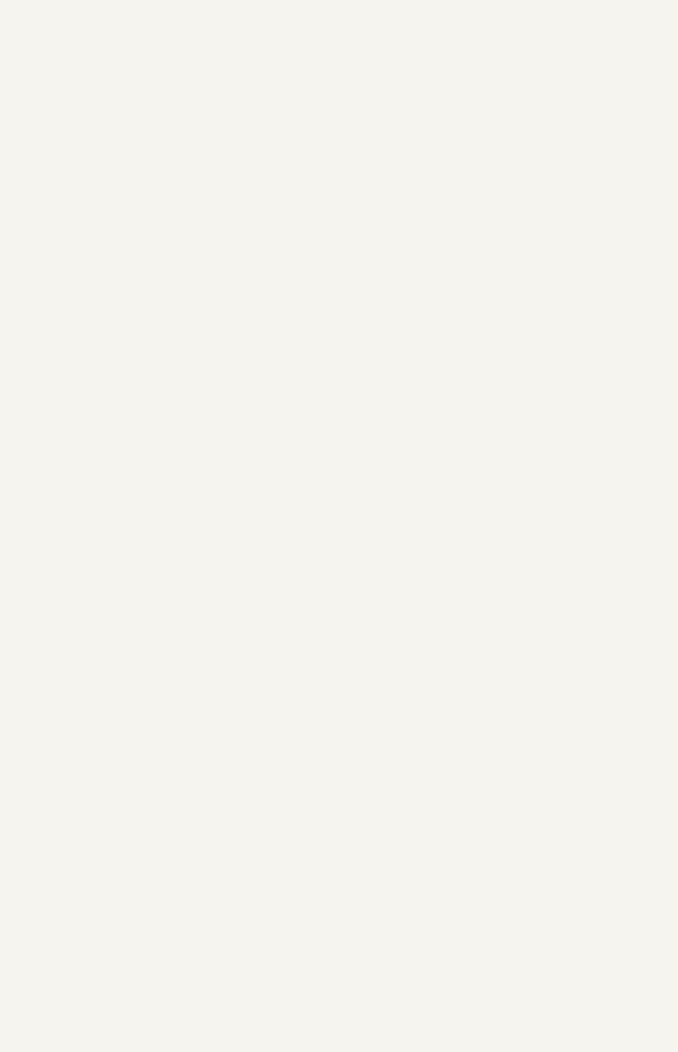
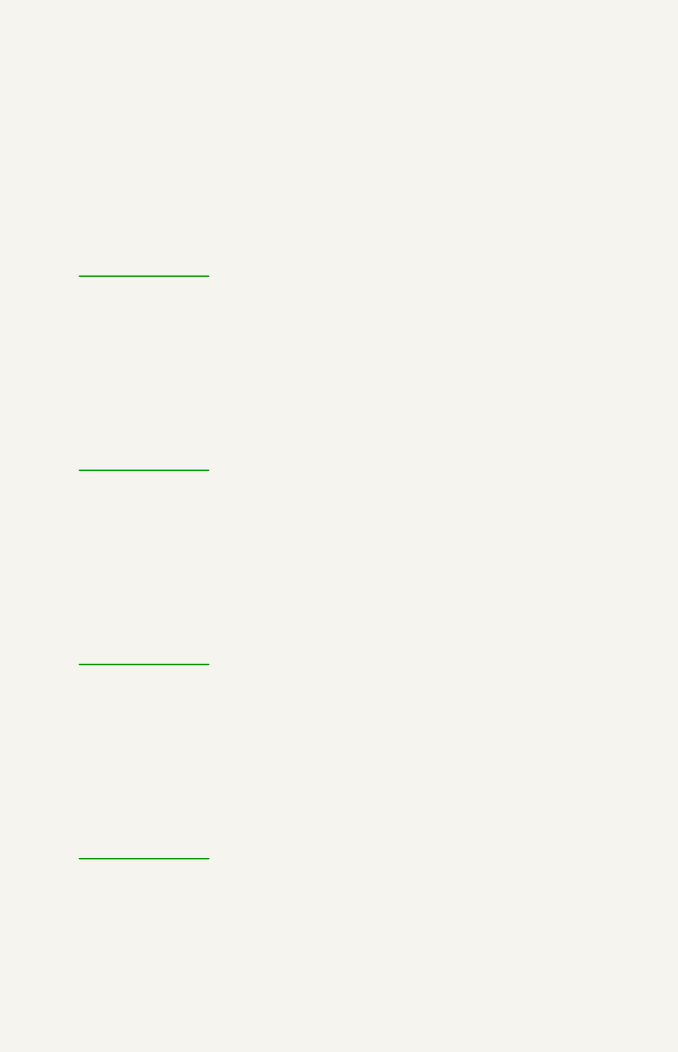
wire: none -> (79, 276) (208, 276)
wire: none -> (79, 470) (208, 470)
wire: none -> (79, 664) (208, 664)
wire: none -> (79, 858) (208, 858)

